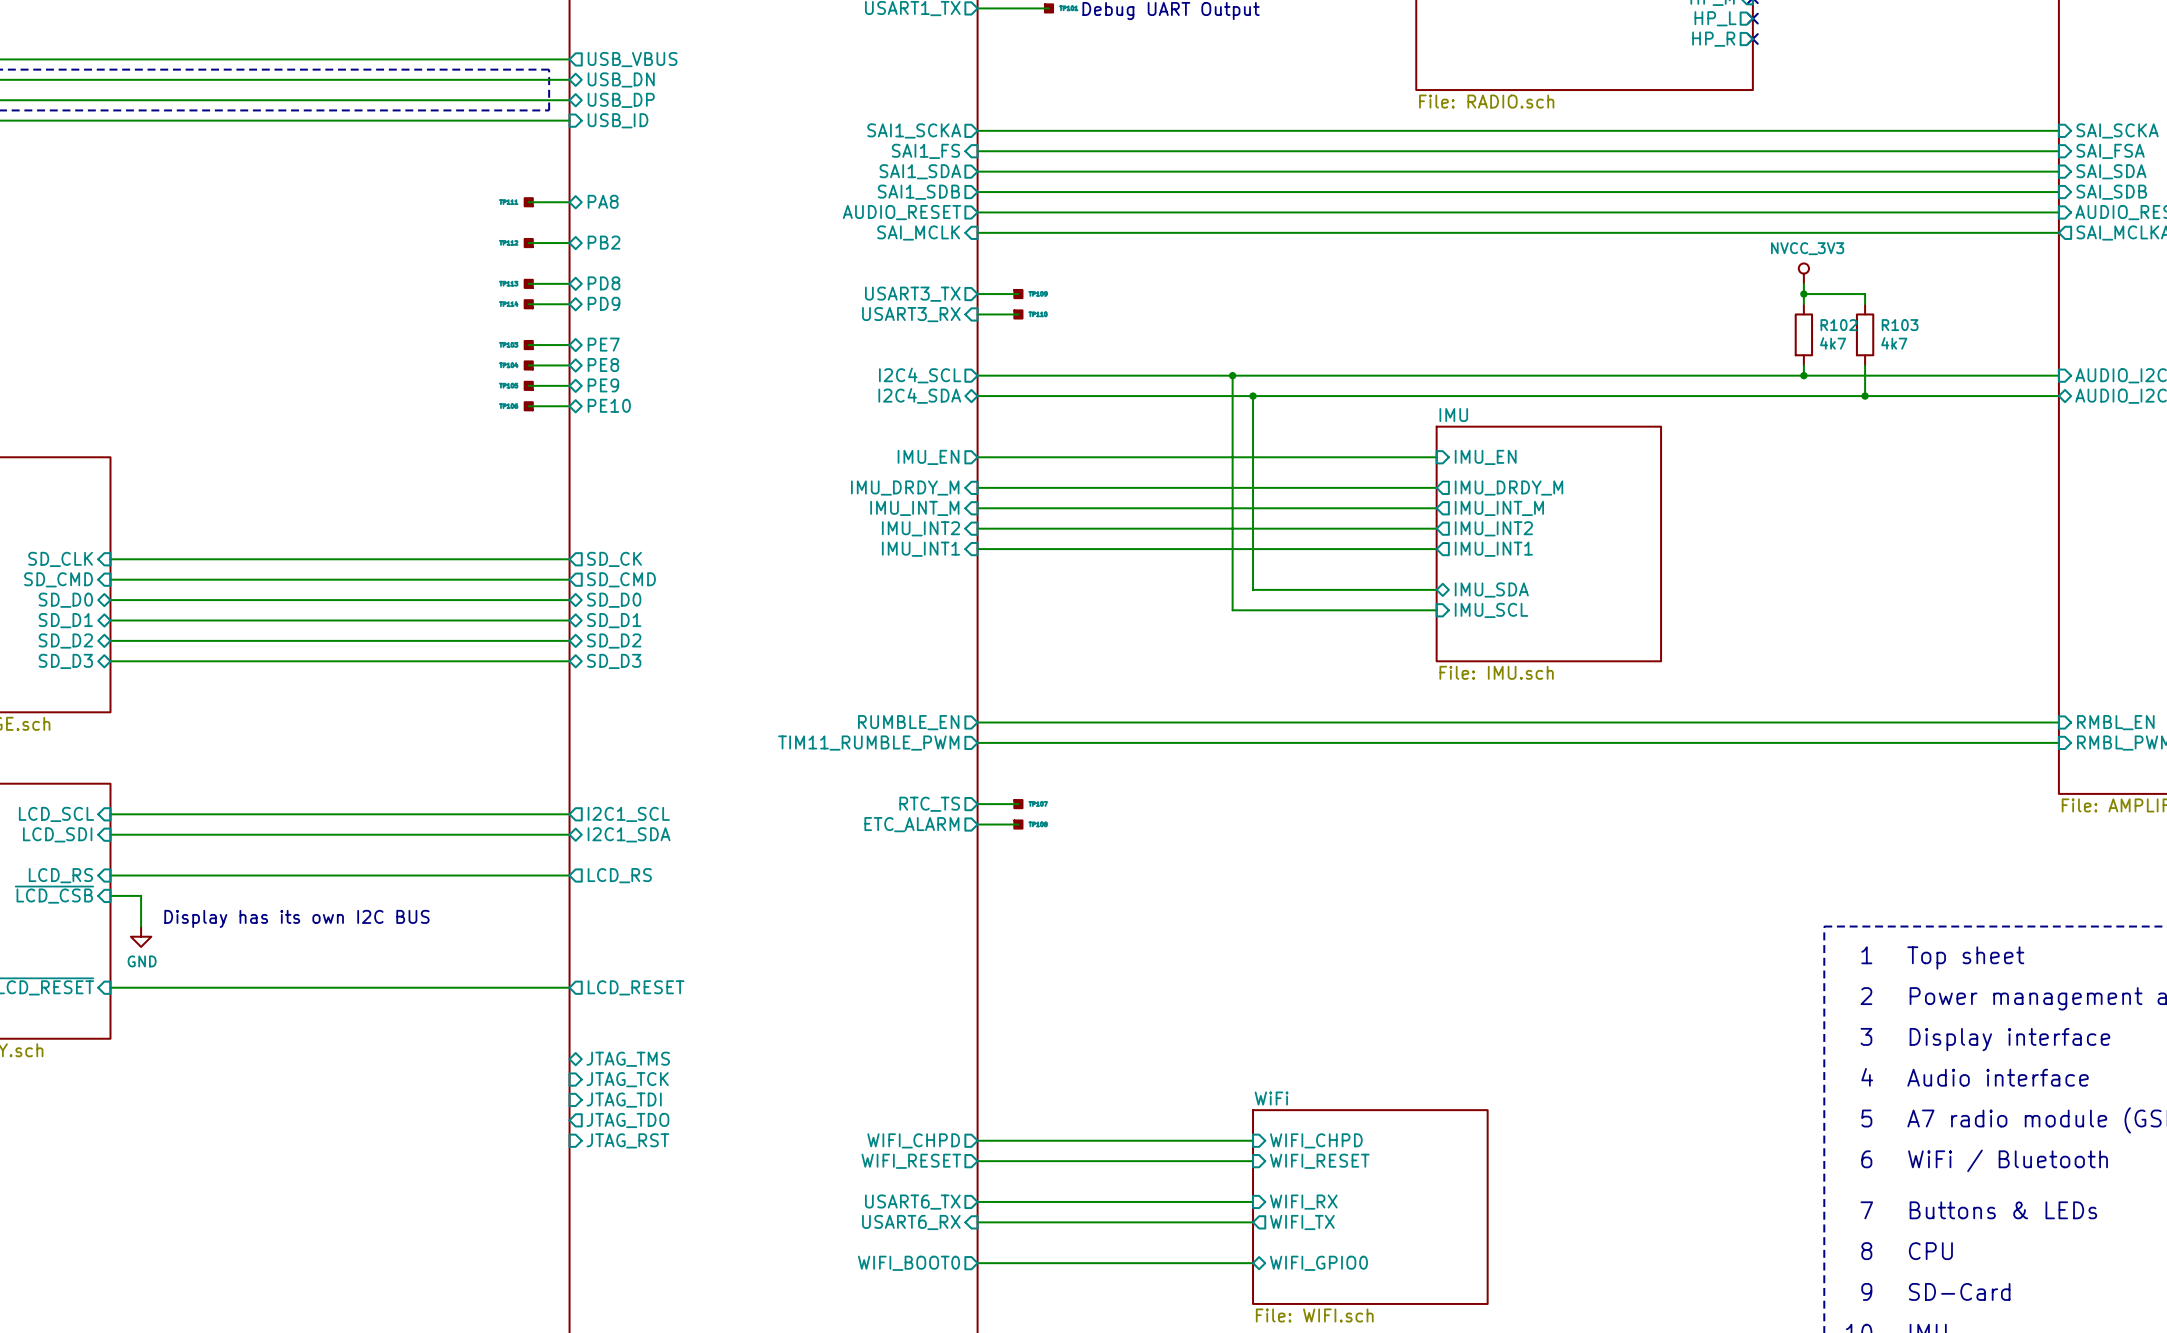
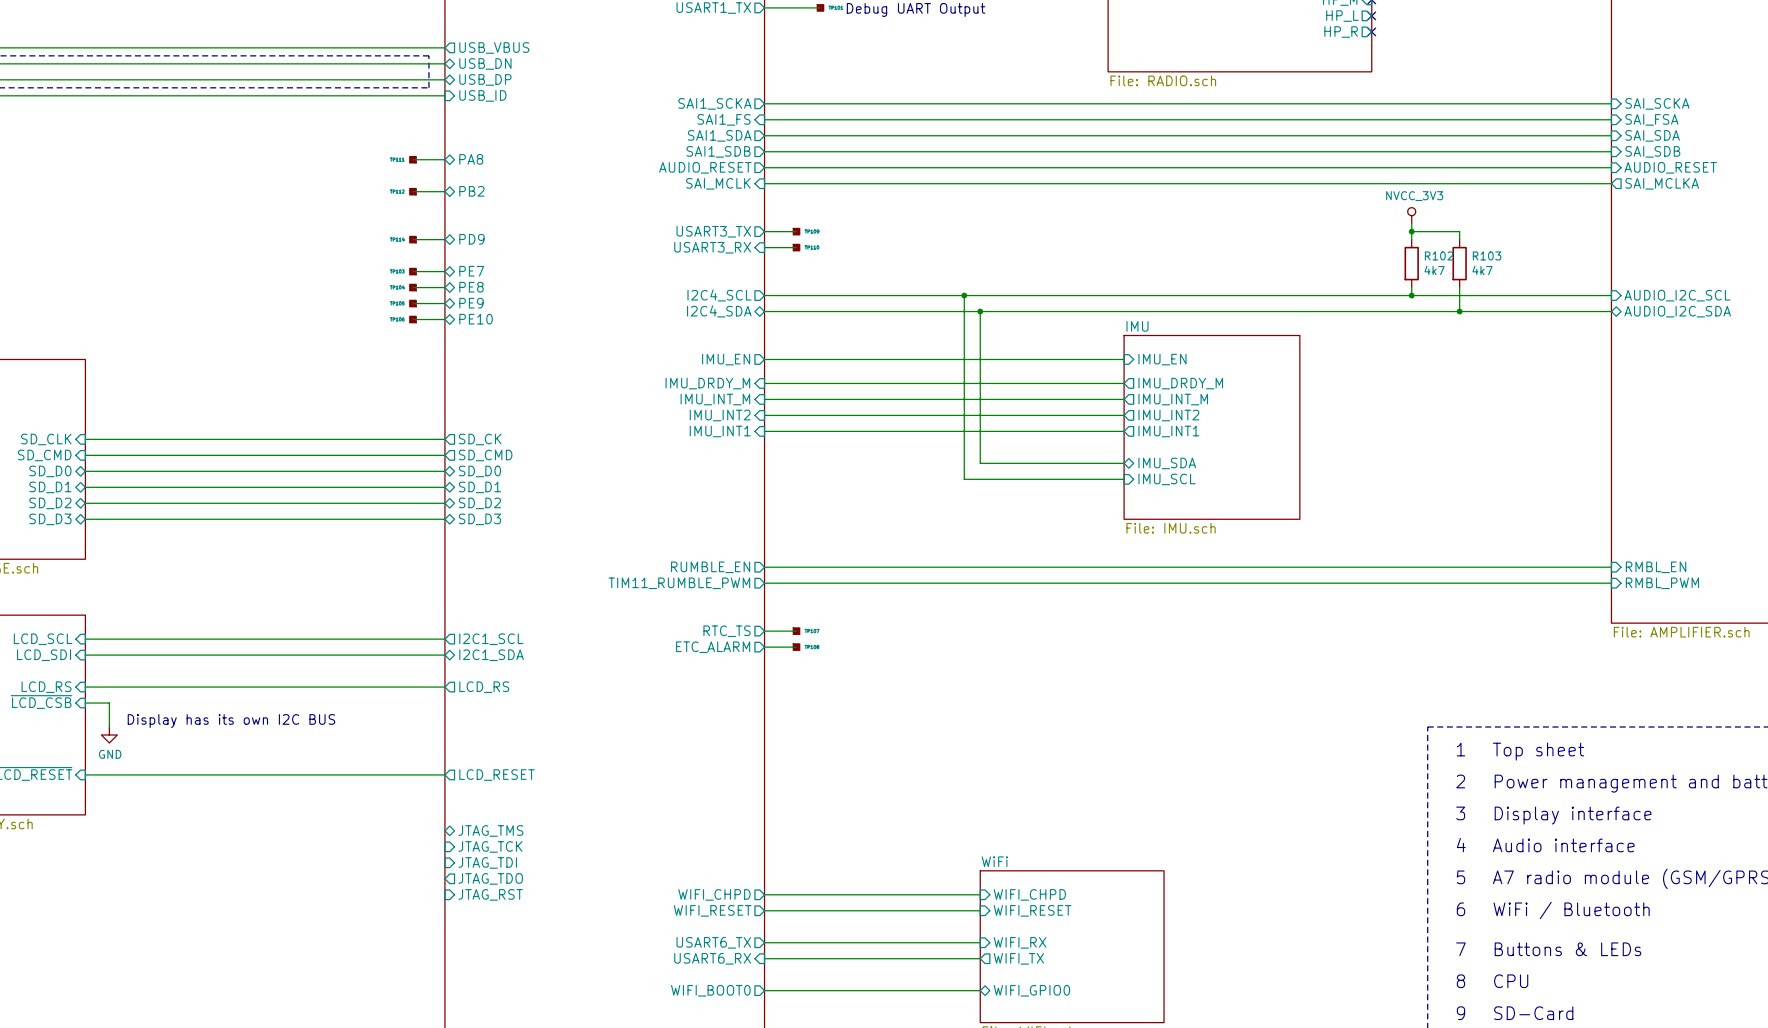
wire: (528, 283) (569, 283) -> none
part: (528, 283) -> none
sheet pin: PD8 (604, 283) -> none

